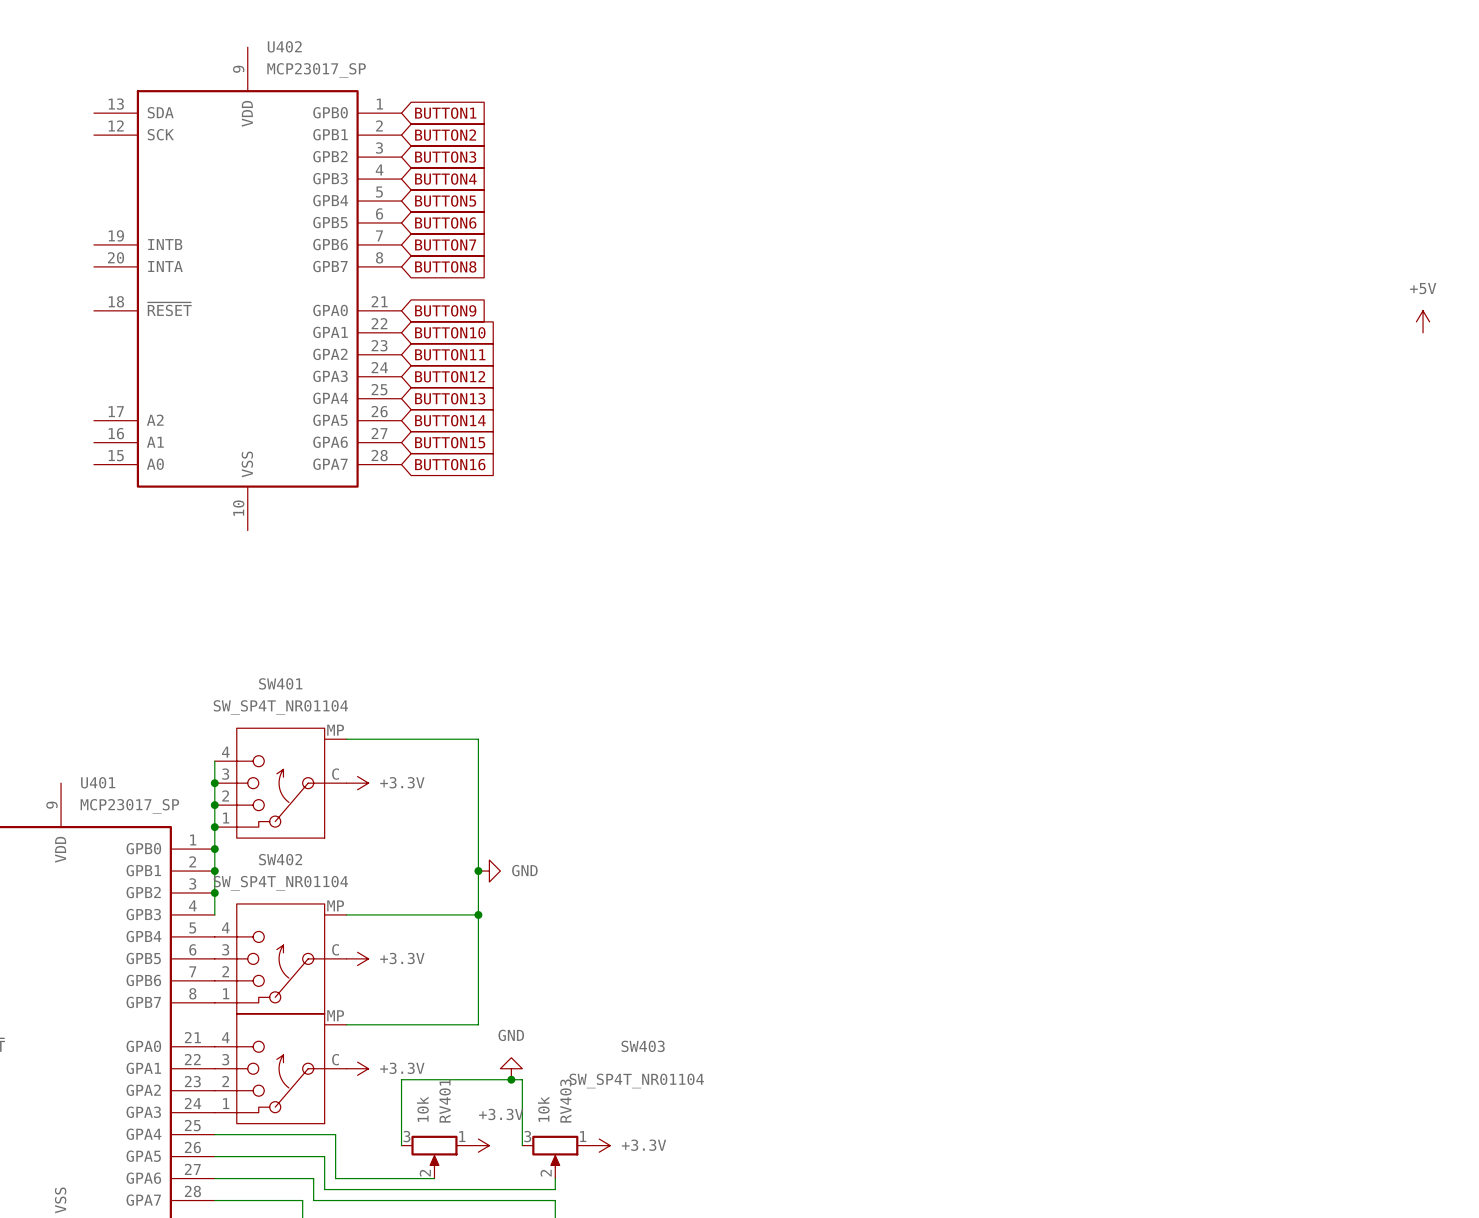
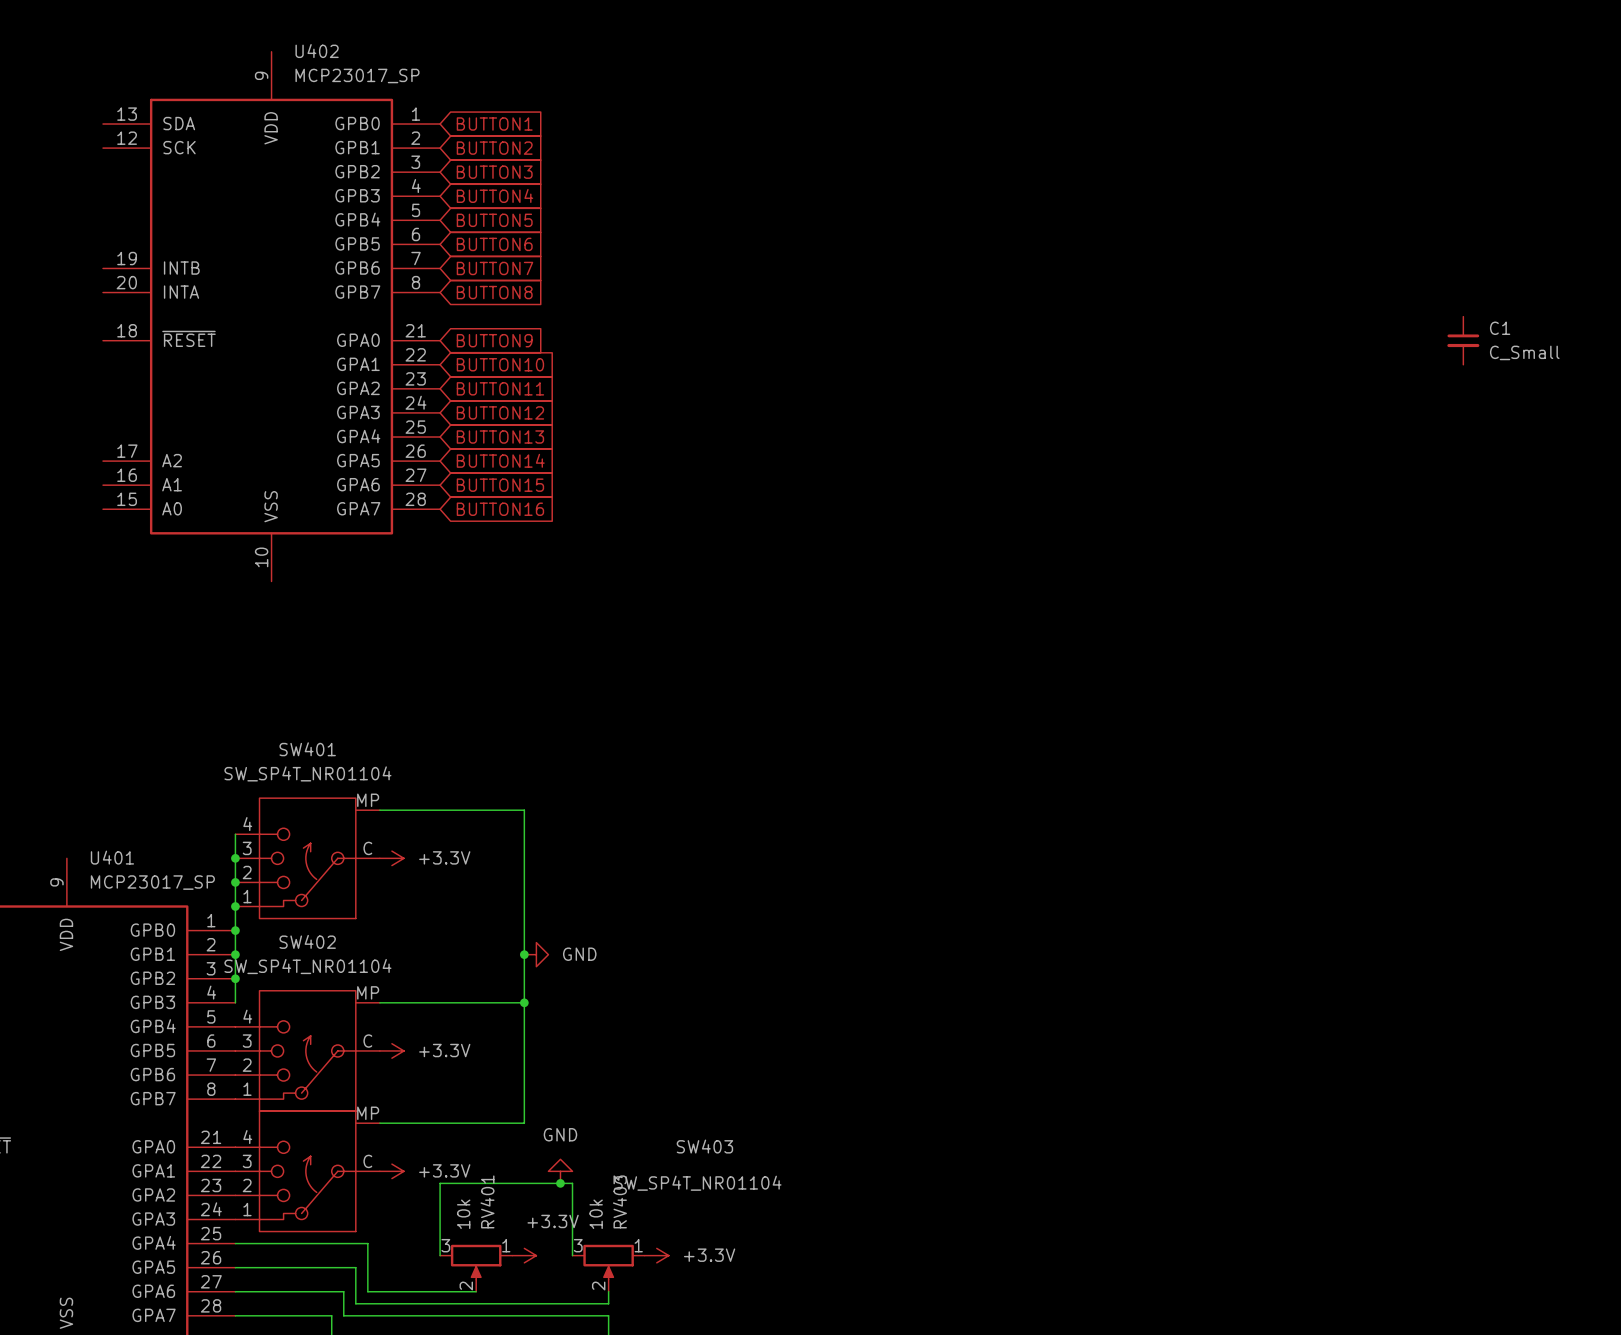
C1: none -> C_Small (1463, 340)
power symbol: +5V (1423, 321) -> none

